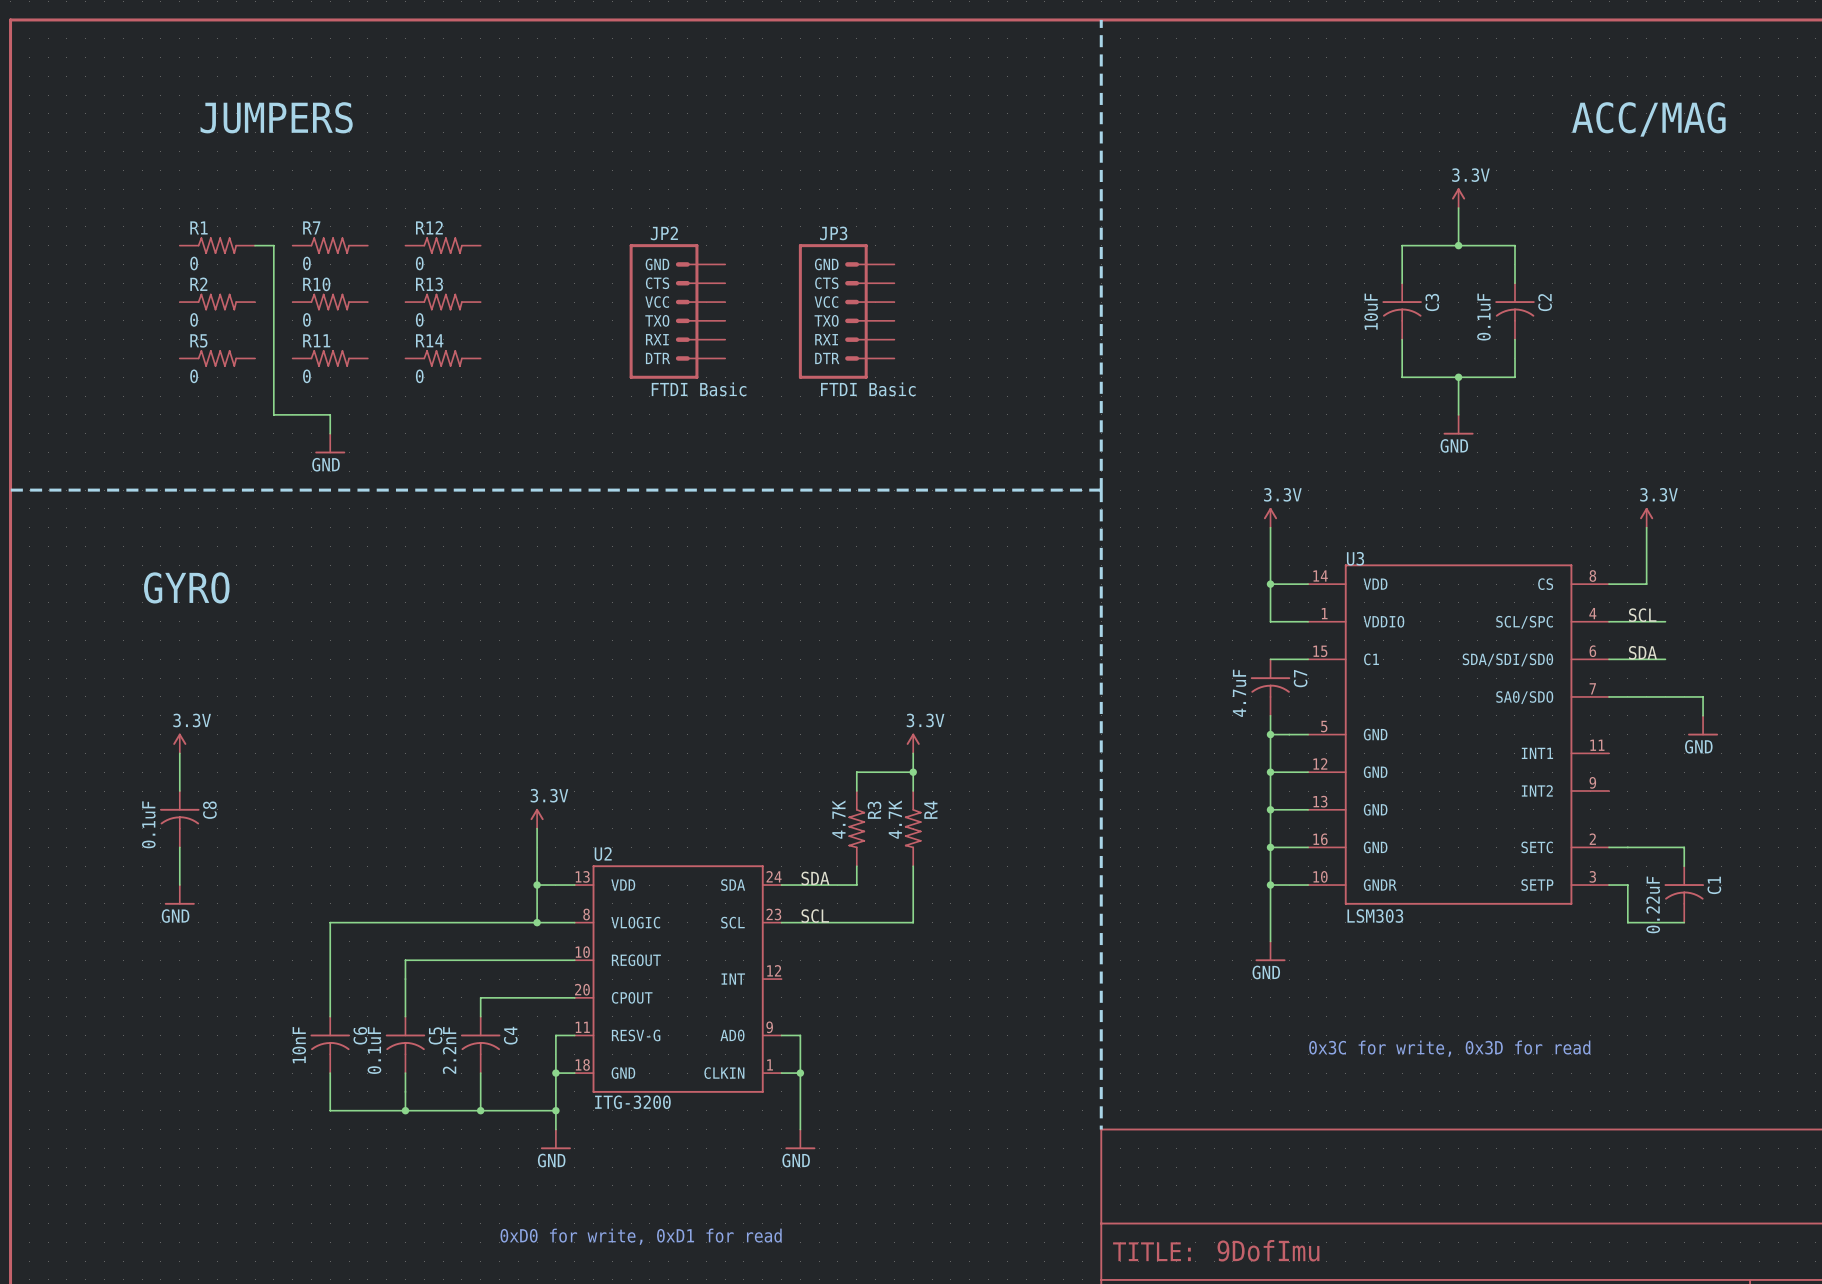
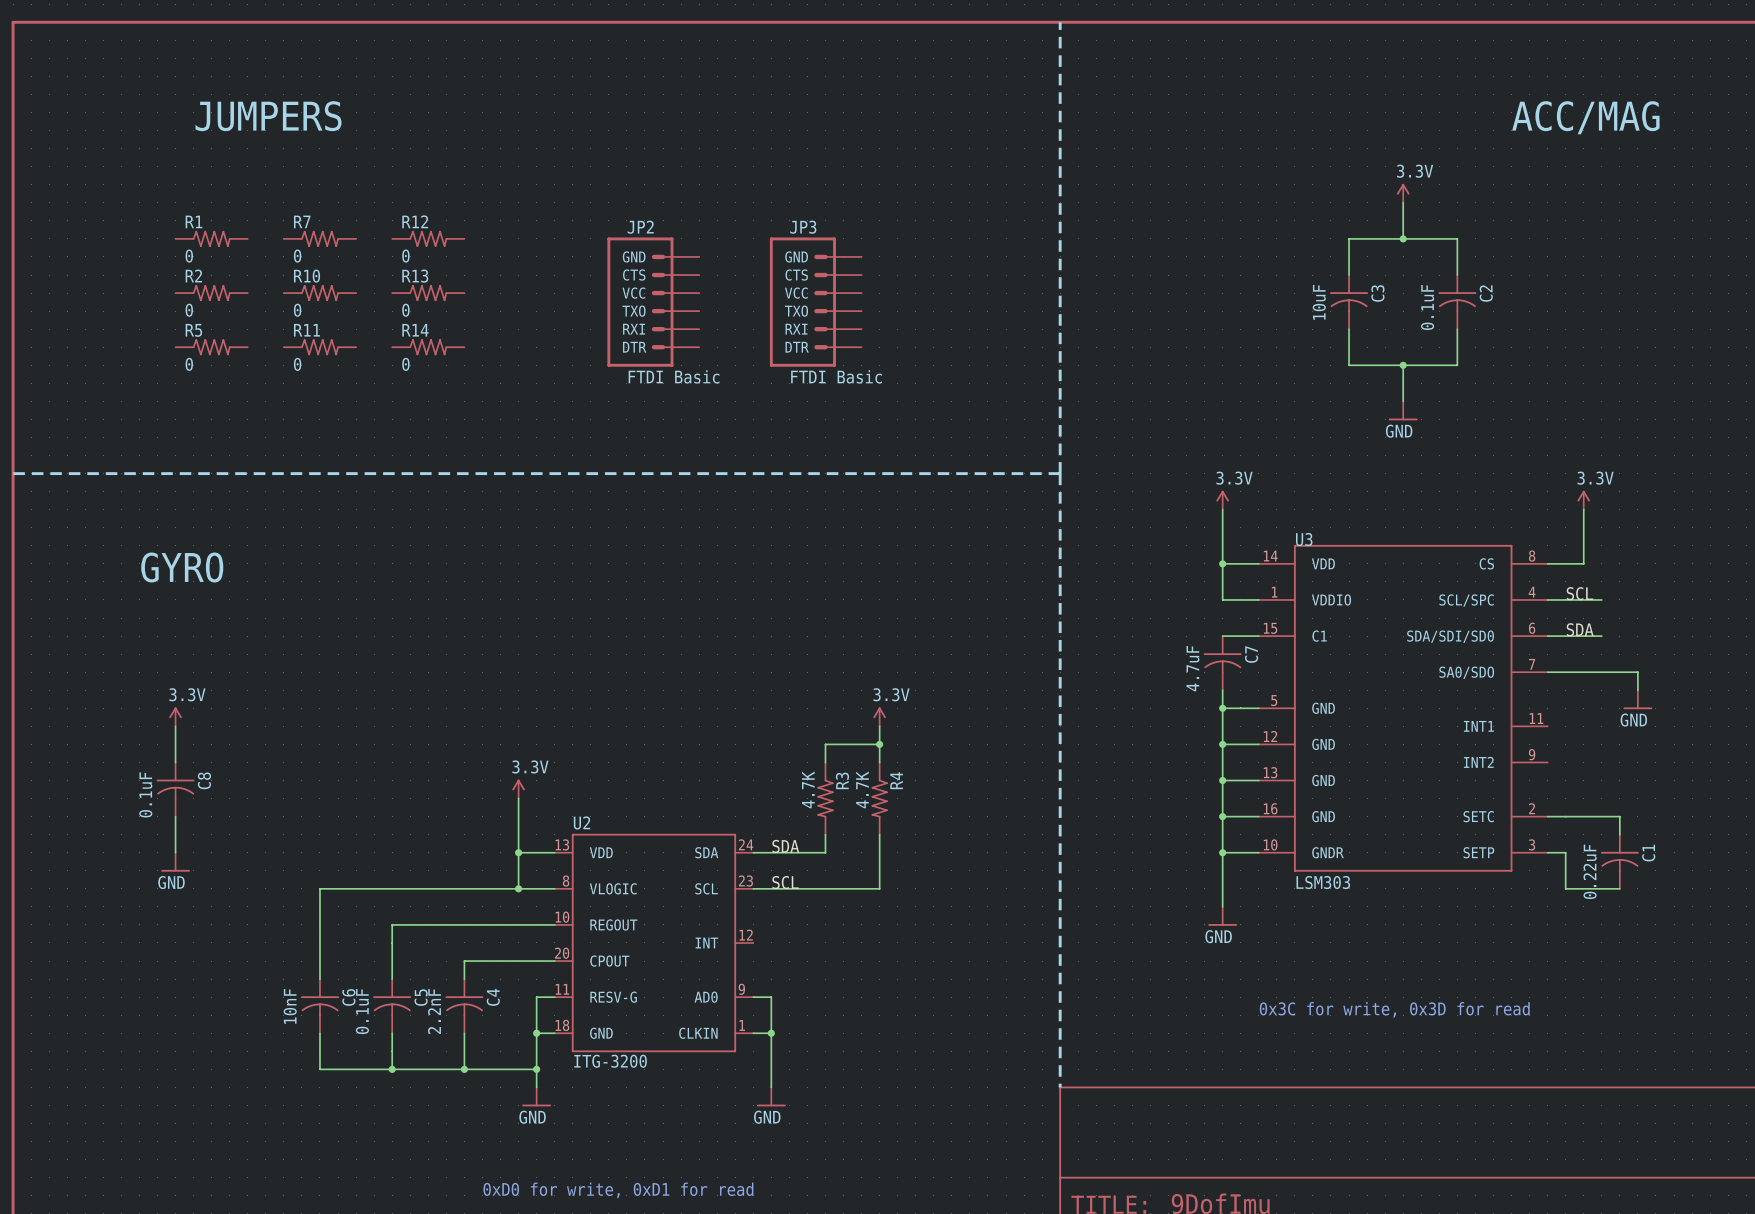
wire: (255, 245) (273, 245) (273, 414) (330, 414) (330, 433) -> none
power symbol: GND (330, 443) -> none

